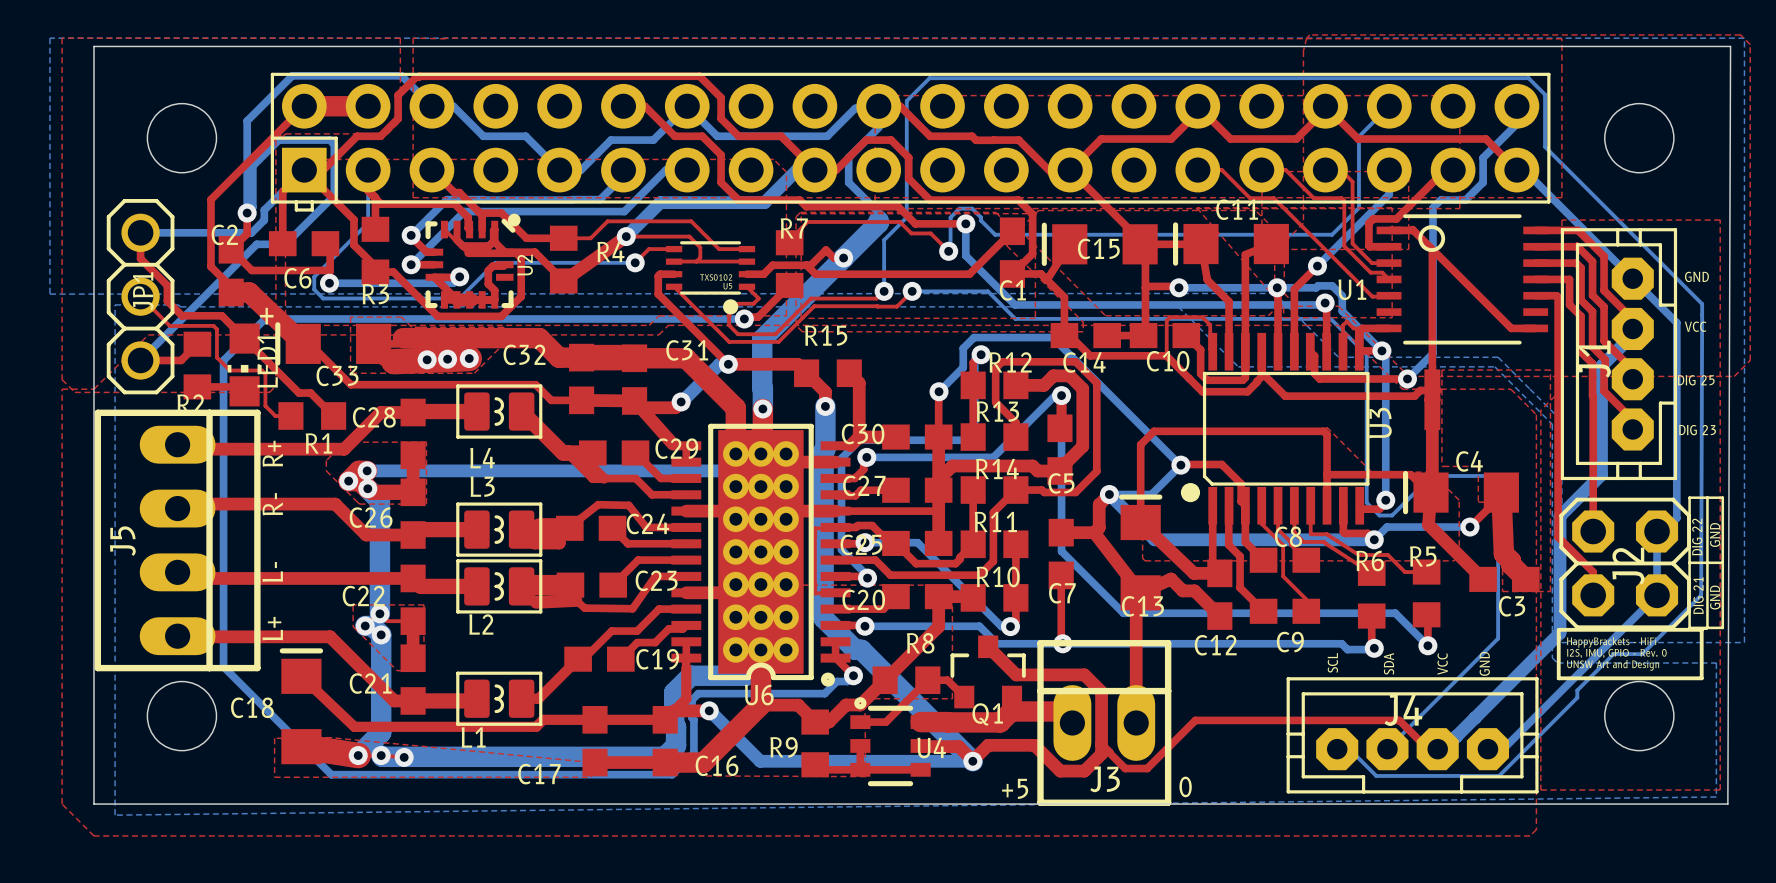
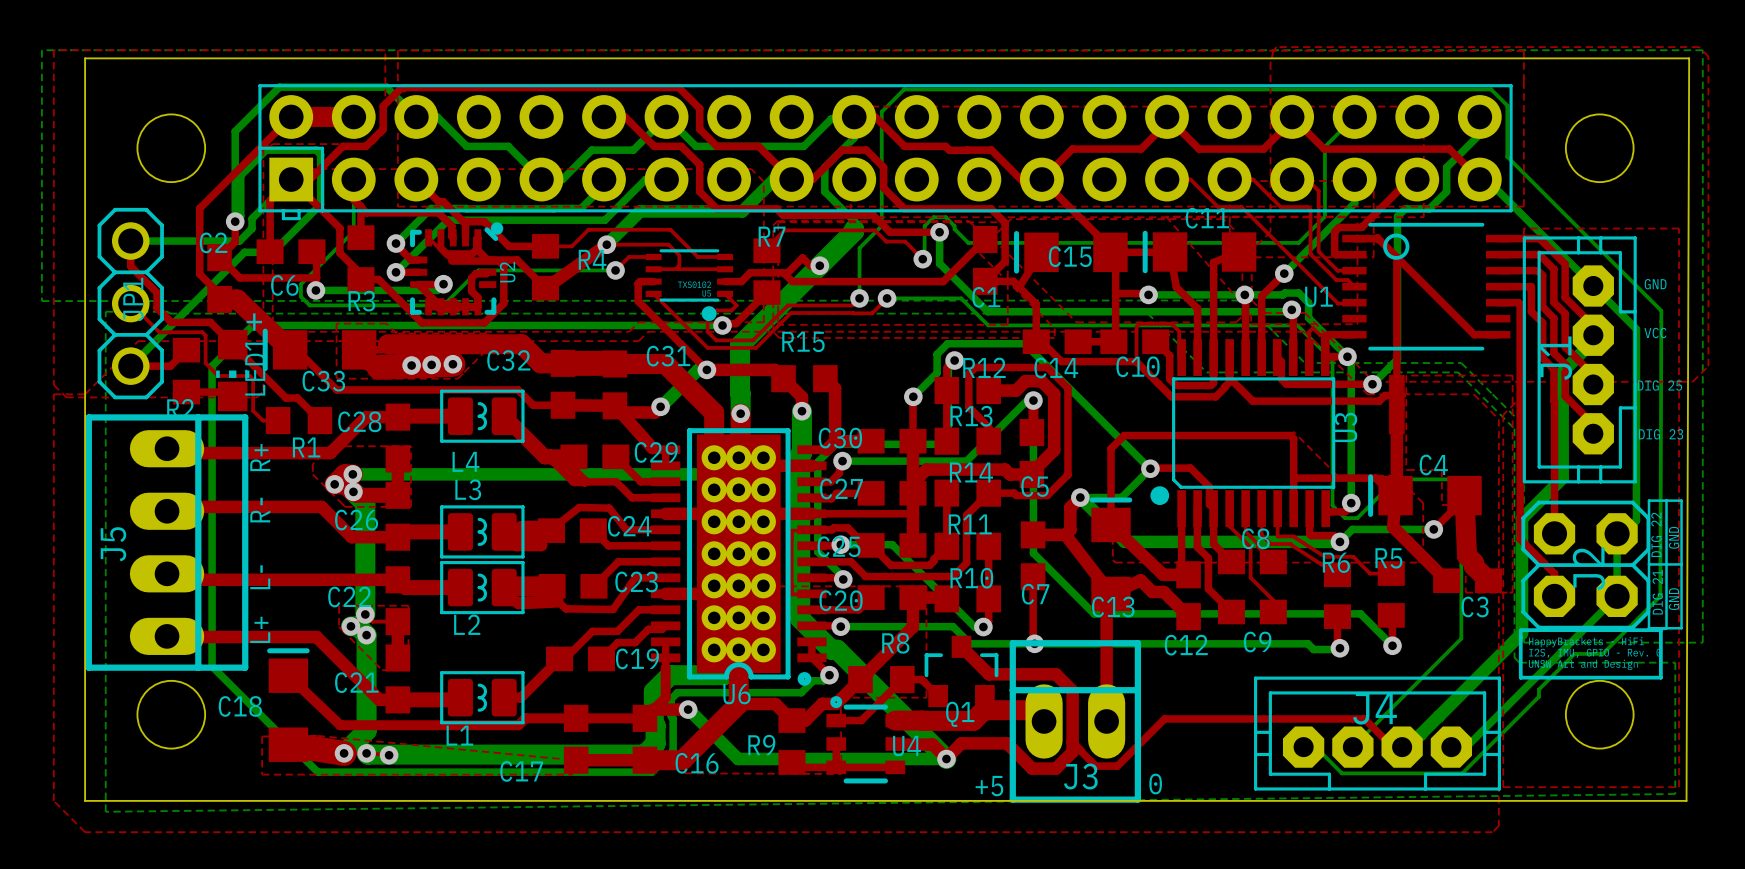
text: SCL (1332, 662) -> none
text: SDA (1389, 663) -> none
text: VCC (1442, 663) -> none
text: GND (1484, 663) -> none

